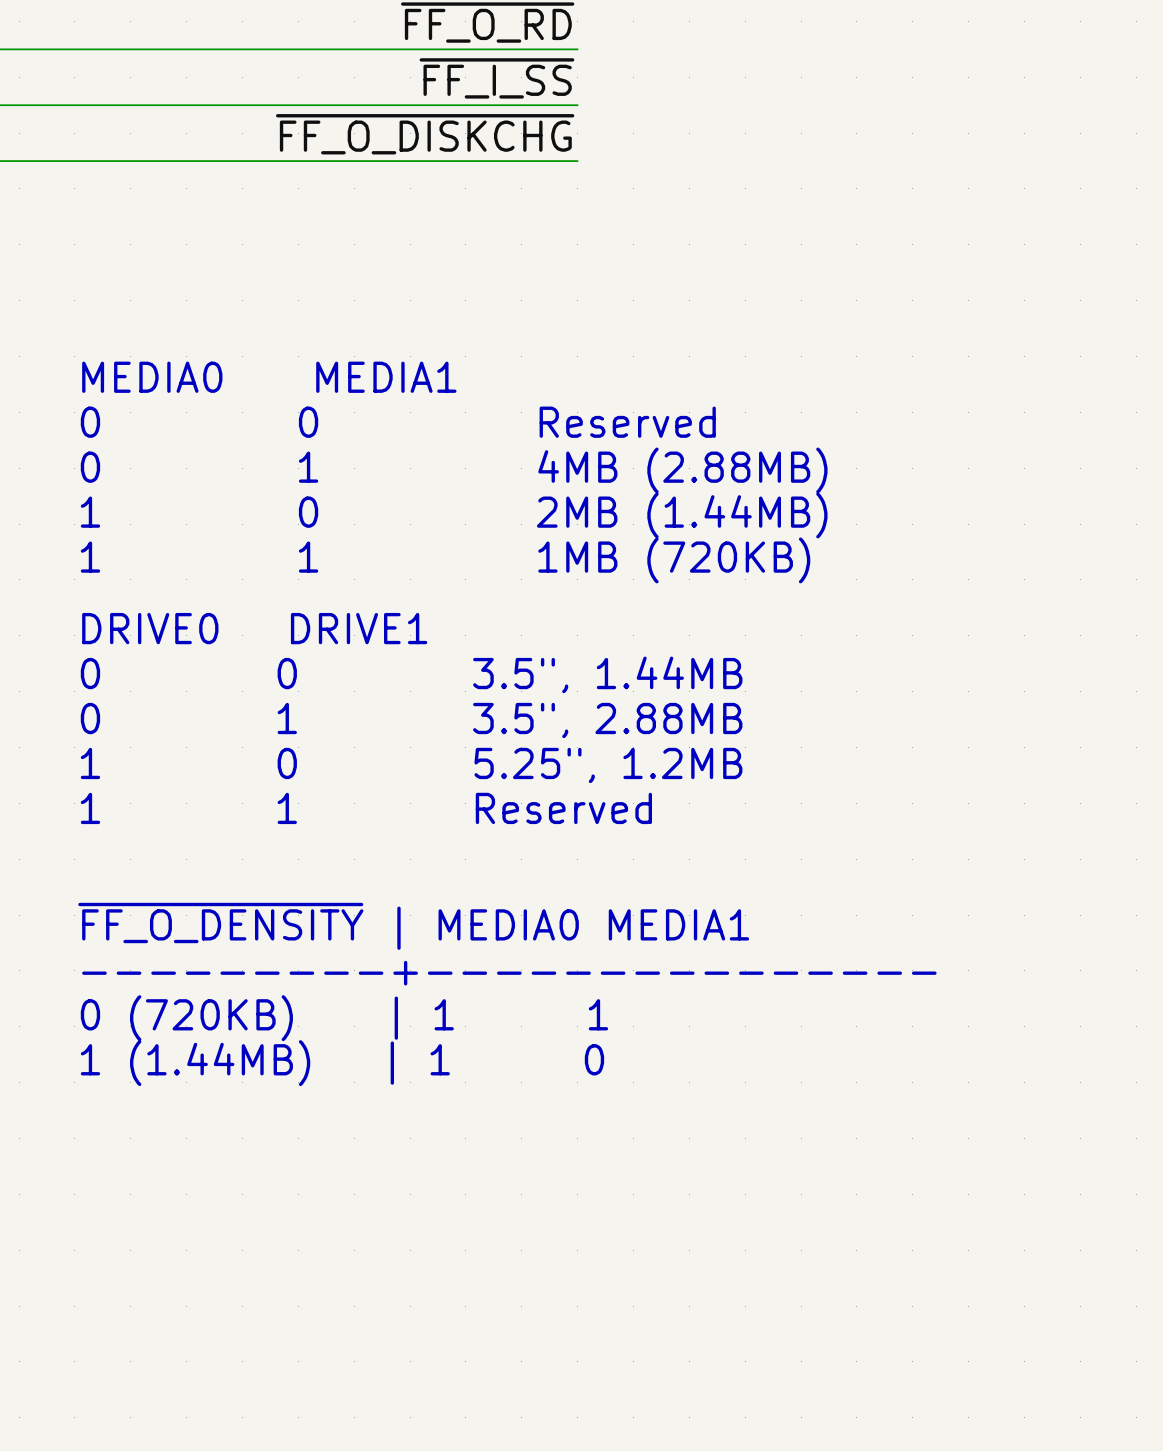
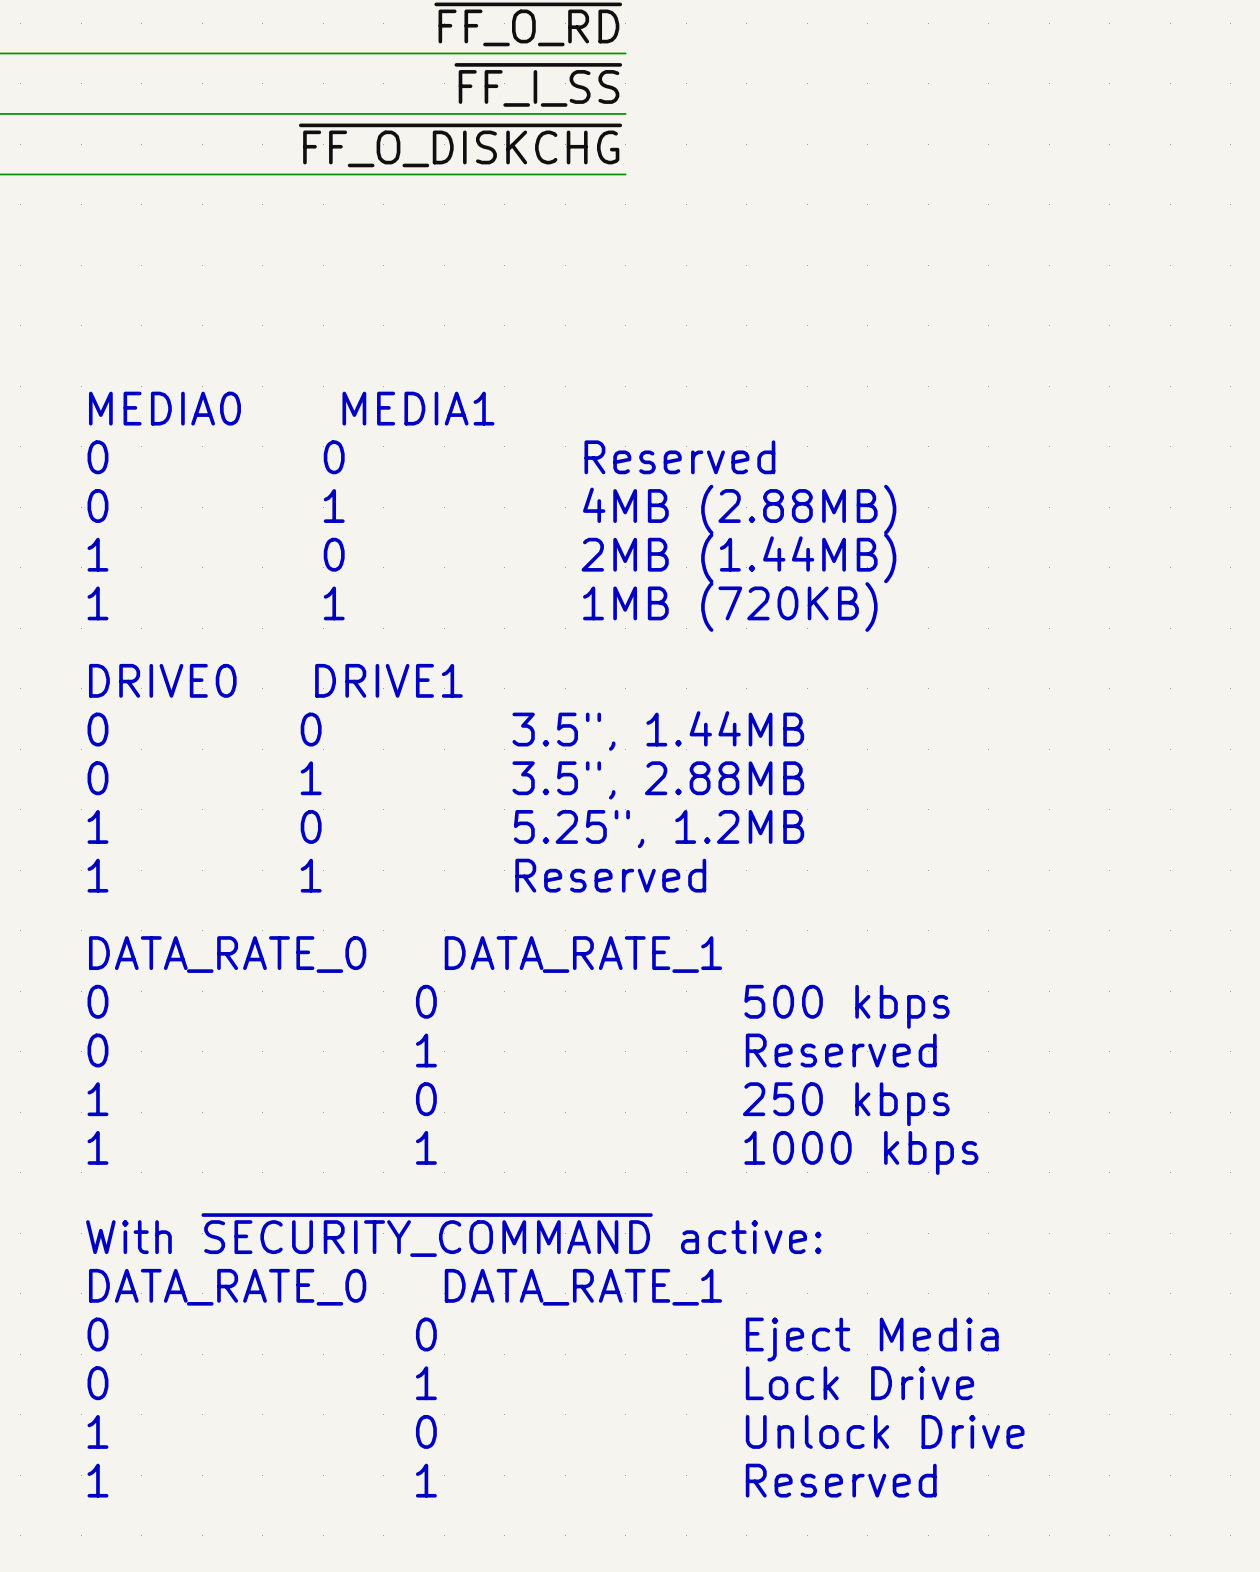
text: none -> DATA_RATE_0 DATA_RATE_1 (405, 954)
text: ~{FF_O_DENSITY} | MEDIA0 MEDIA1 (413, 926) -> 0 0 500 kbps (518, 1006)
text: ---------+--------------- (509, 973) -> 0 1 Reserved (512, 1050)
text: 0 (720KB) | 1 1 (344, 1018) -> 1 0 250 kbps (518, 1104)
text: 1 (1.44MB) | 1 0 (342, 1063) -> 1 1 1000 kbps (532, 1152)
text: none -> With ~{SECURITY_COMMAND} active: (453, 1235)
text: none -> DATA_RATE_0 DATA_RATE_1 (405, 1287)
text: none -> 0 0 Eject Media (543, 1339)
text: none -> 0 1 Lock Drive (530, 1383)
text: none -> 1 0 Unlock Drive (556, 1431)
text: none -> 1 1 Reserved (512, 1480)

